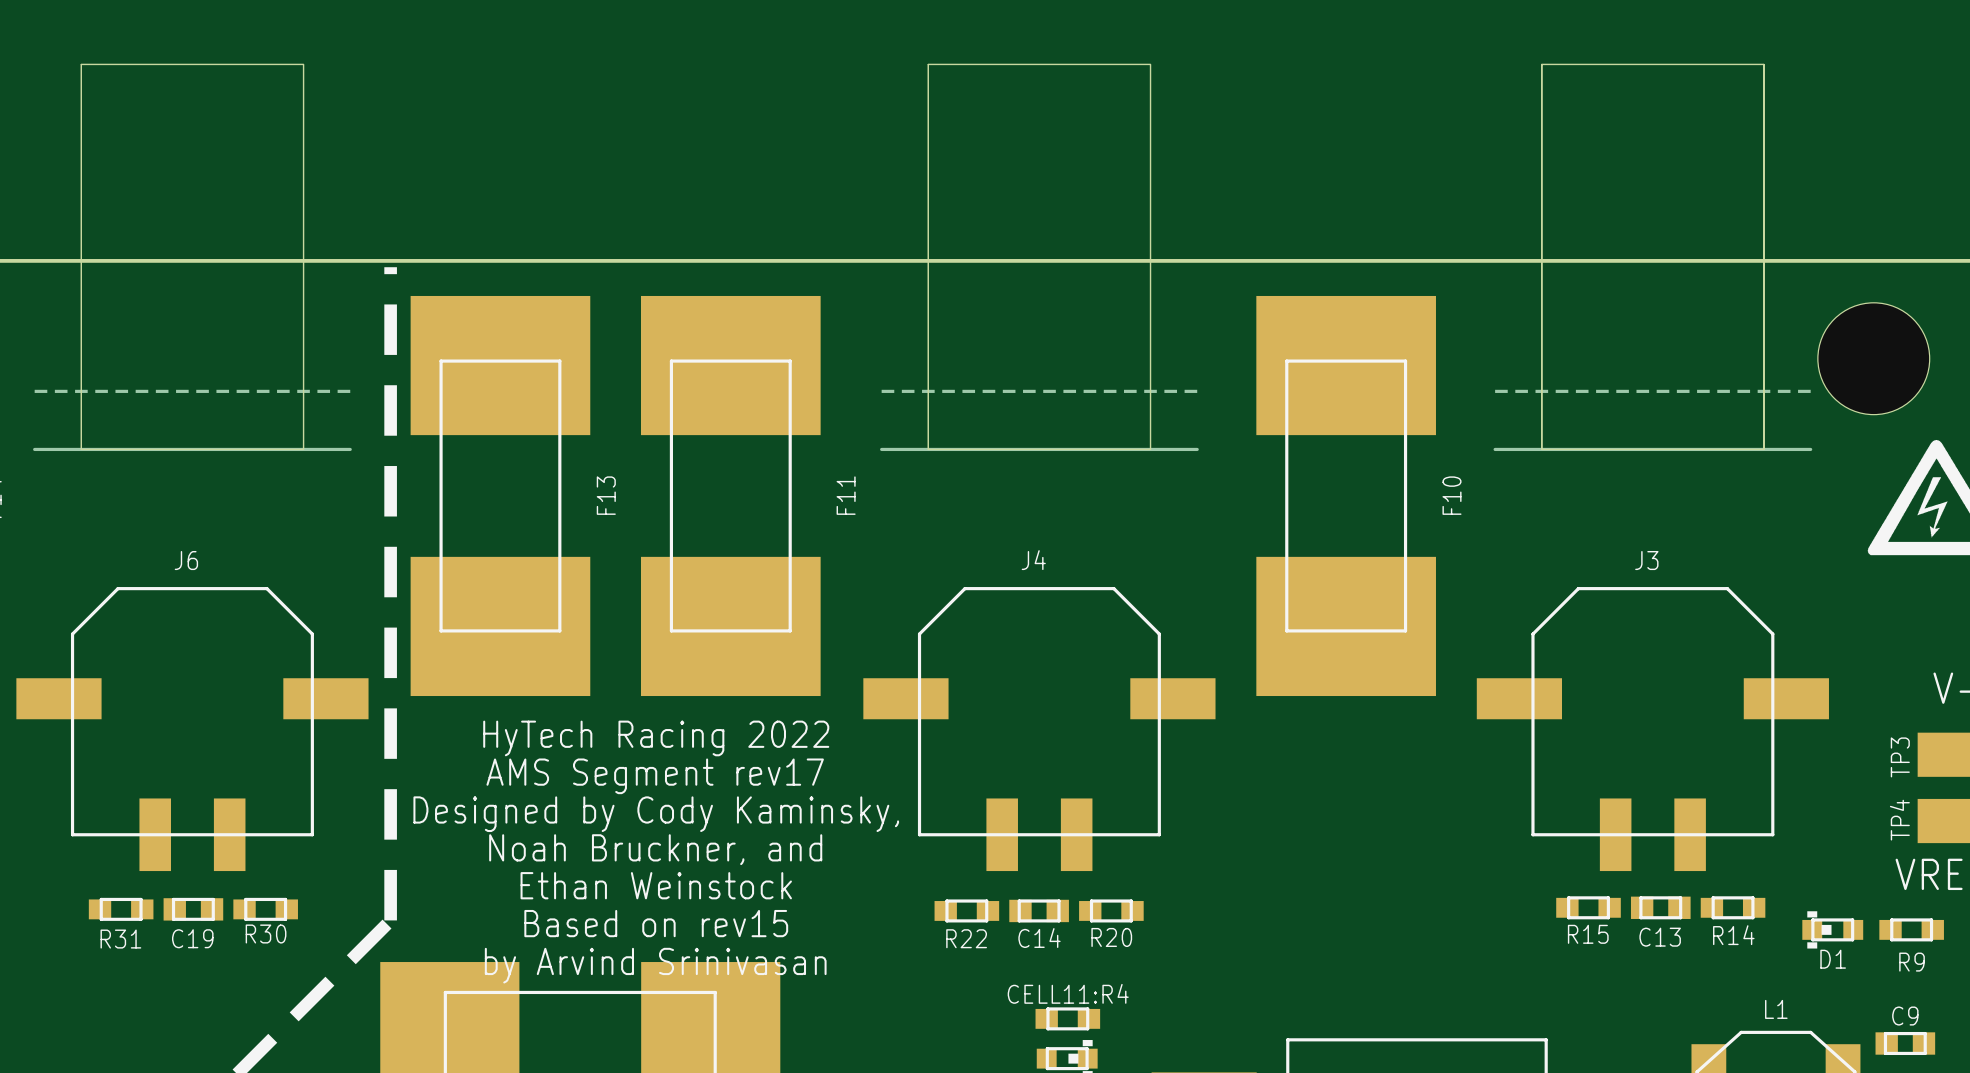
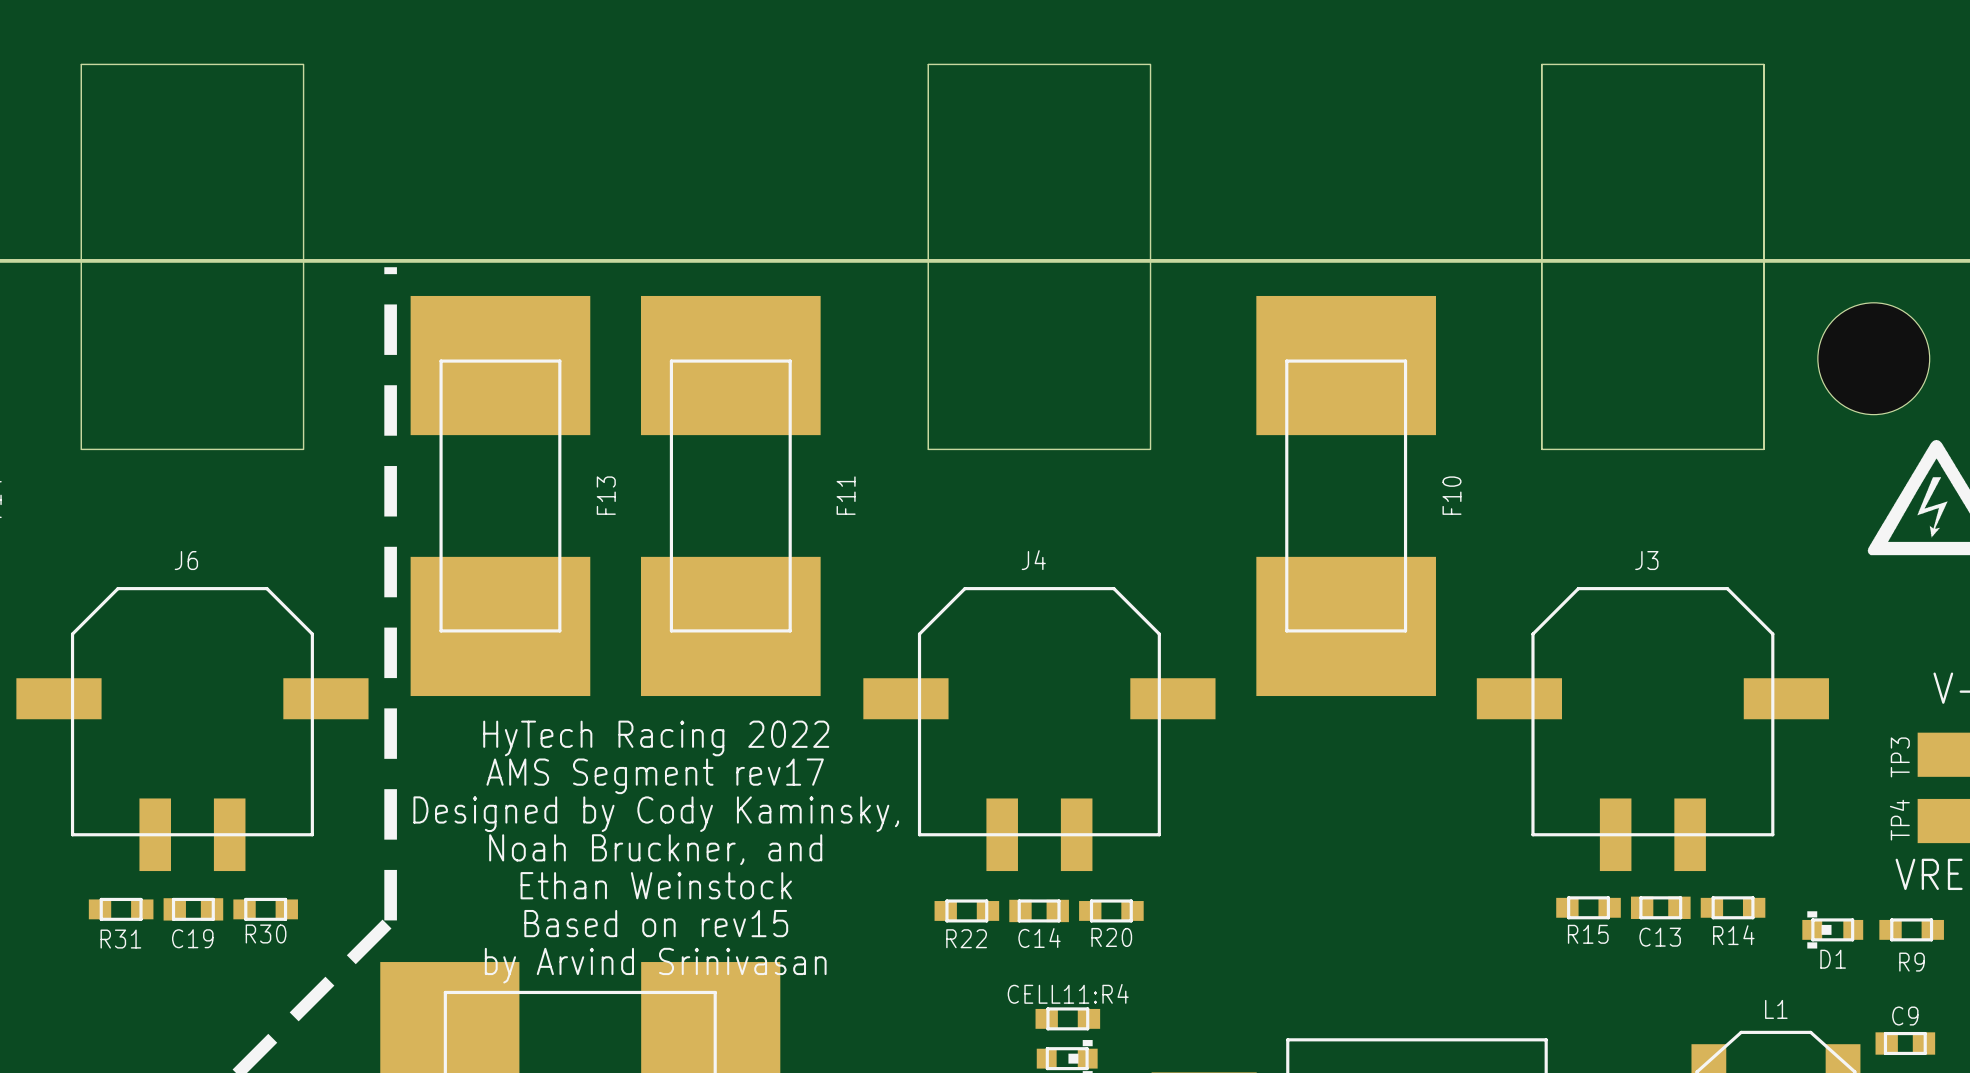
J6 footprint: [16, 64, 369, 872] -> [16, 64, 369, 872]
J4 footprint: [863, 64, 1216, 872] -> [863, 64, 1216, 872]
J3 footprint: [1476, 64, 1829, 872] -> [1476, 64, 1829, 872]

